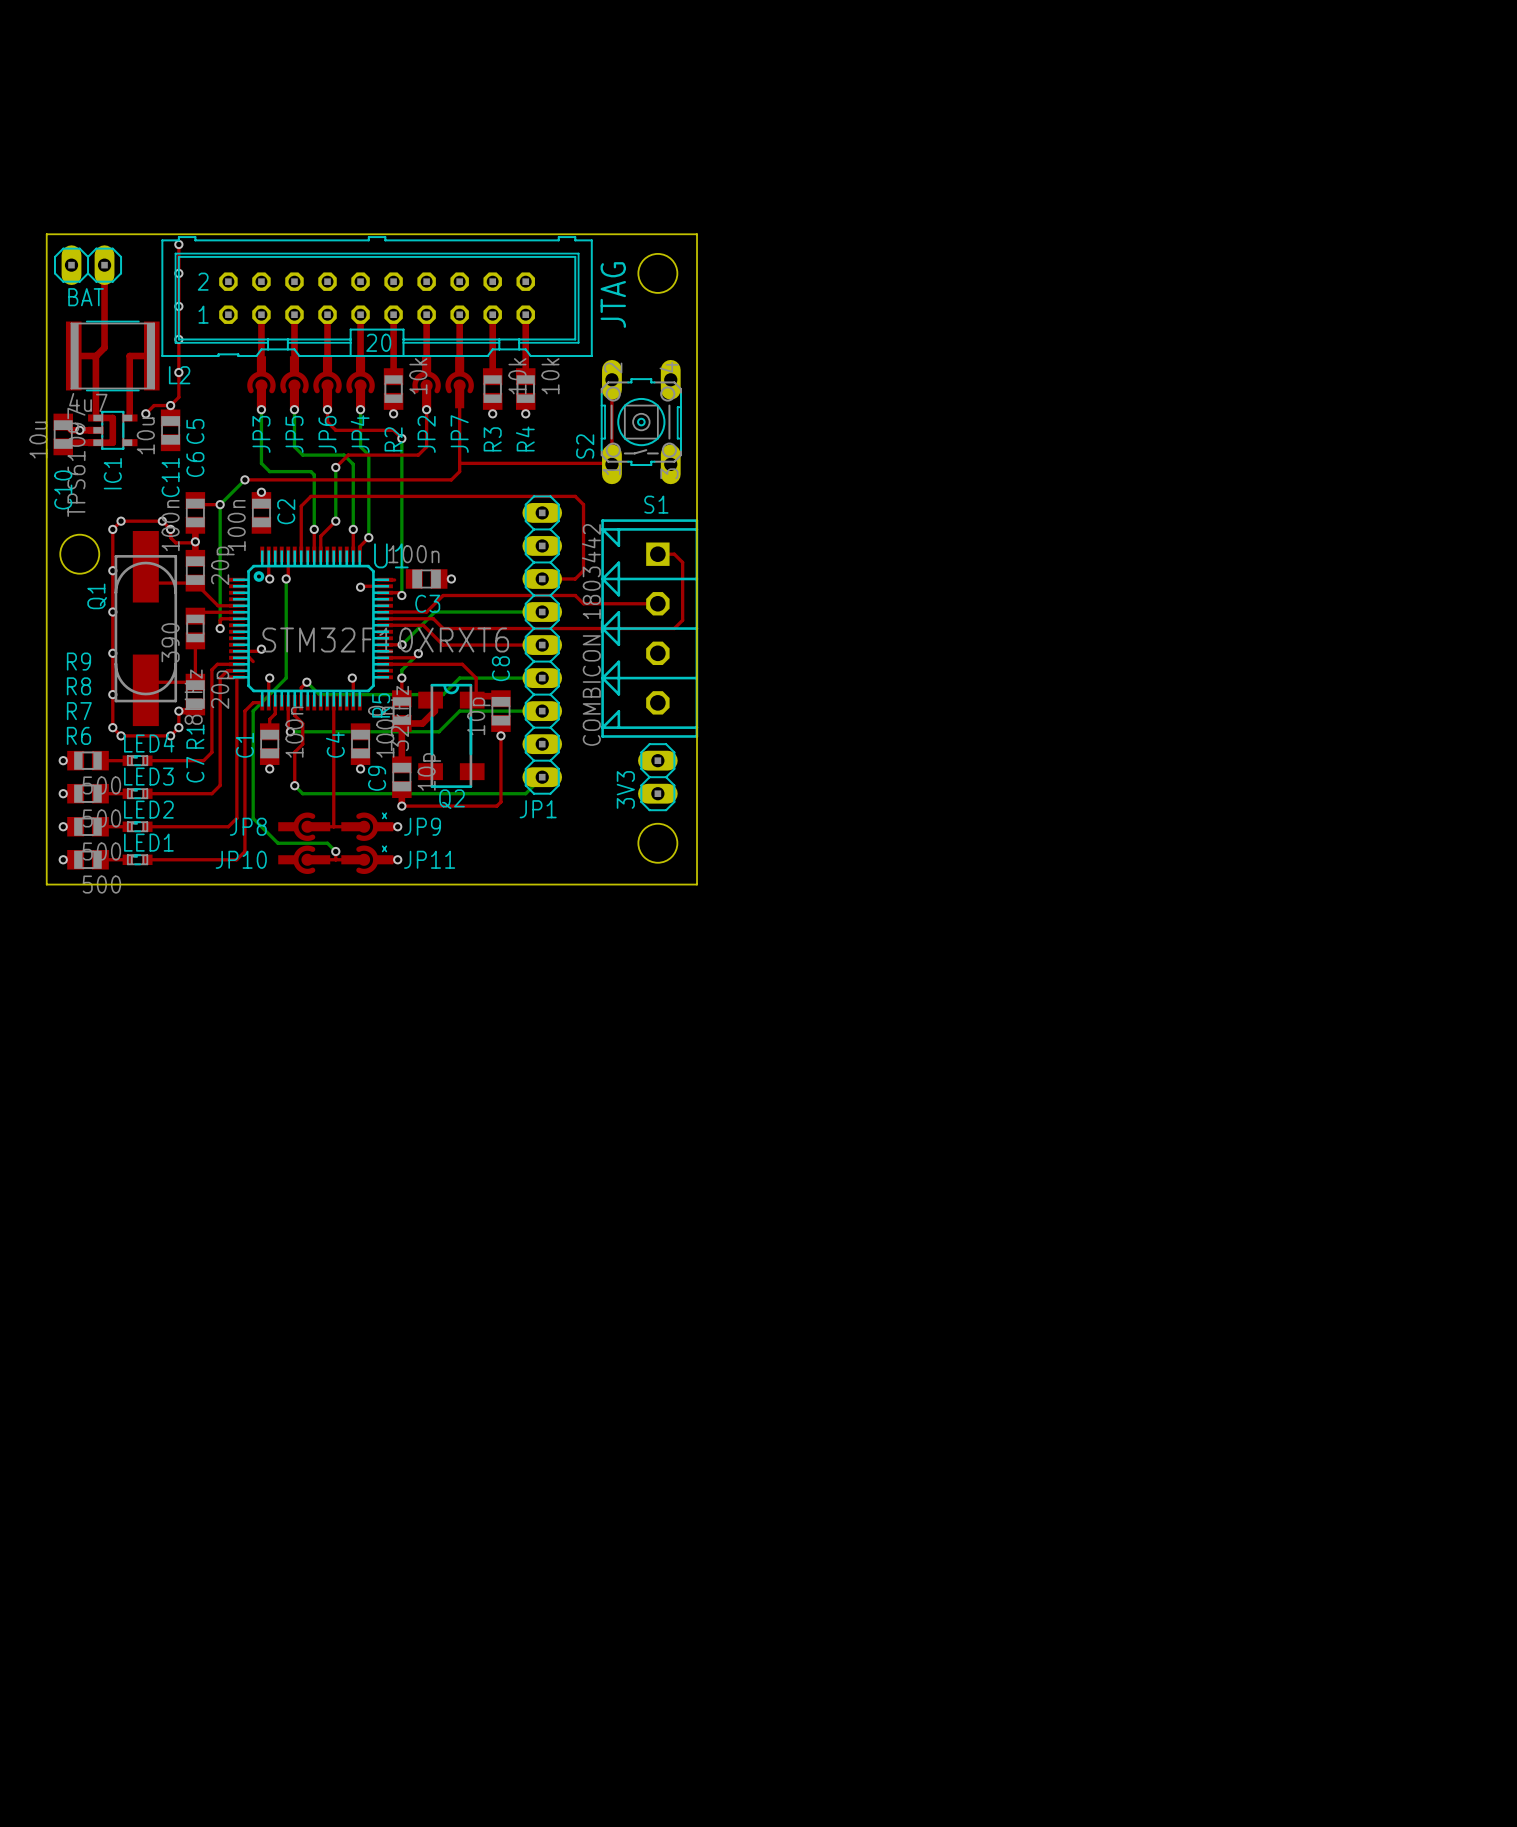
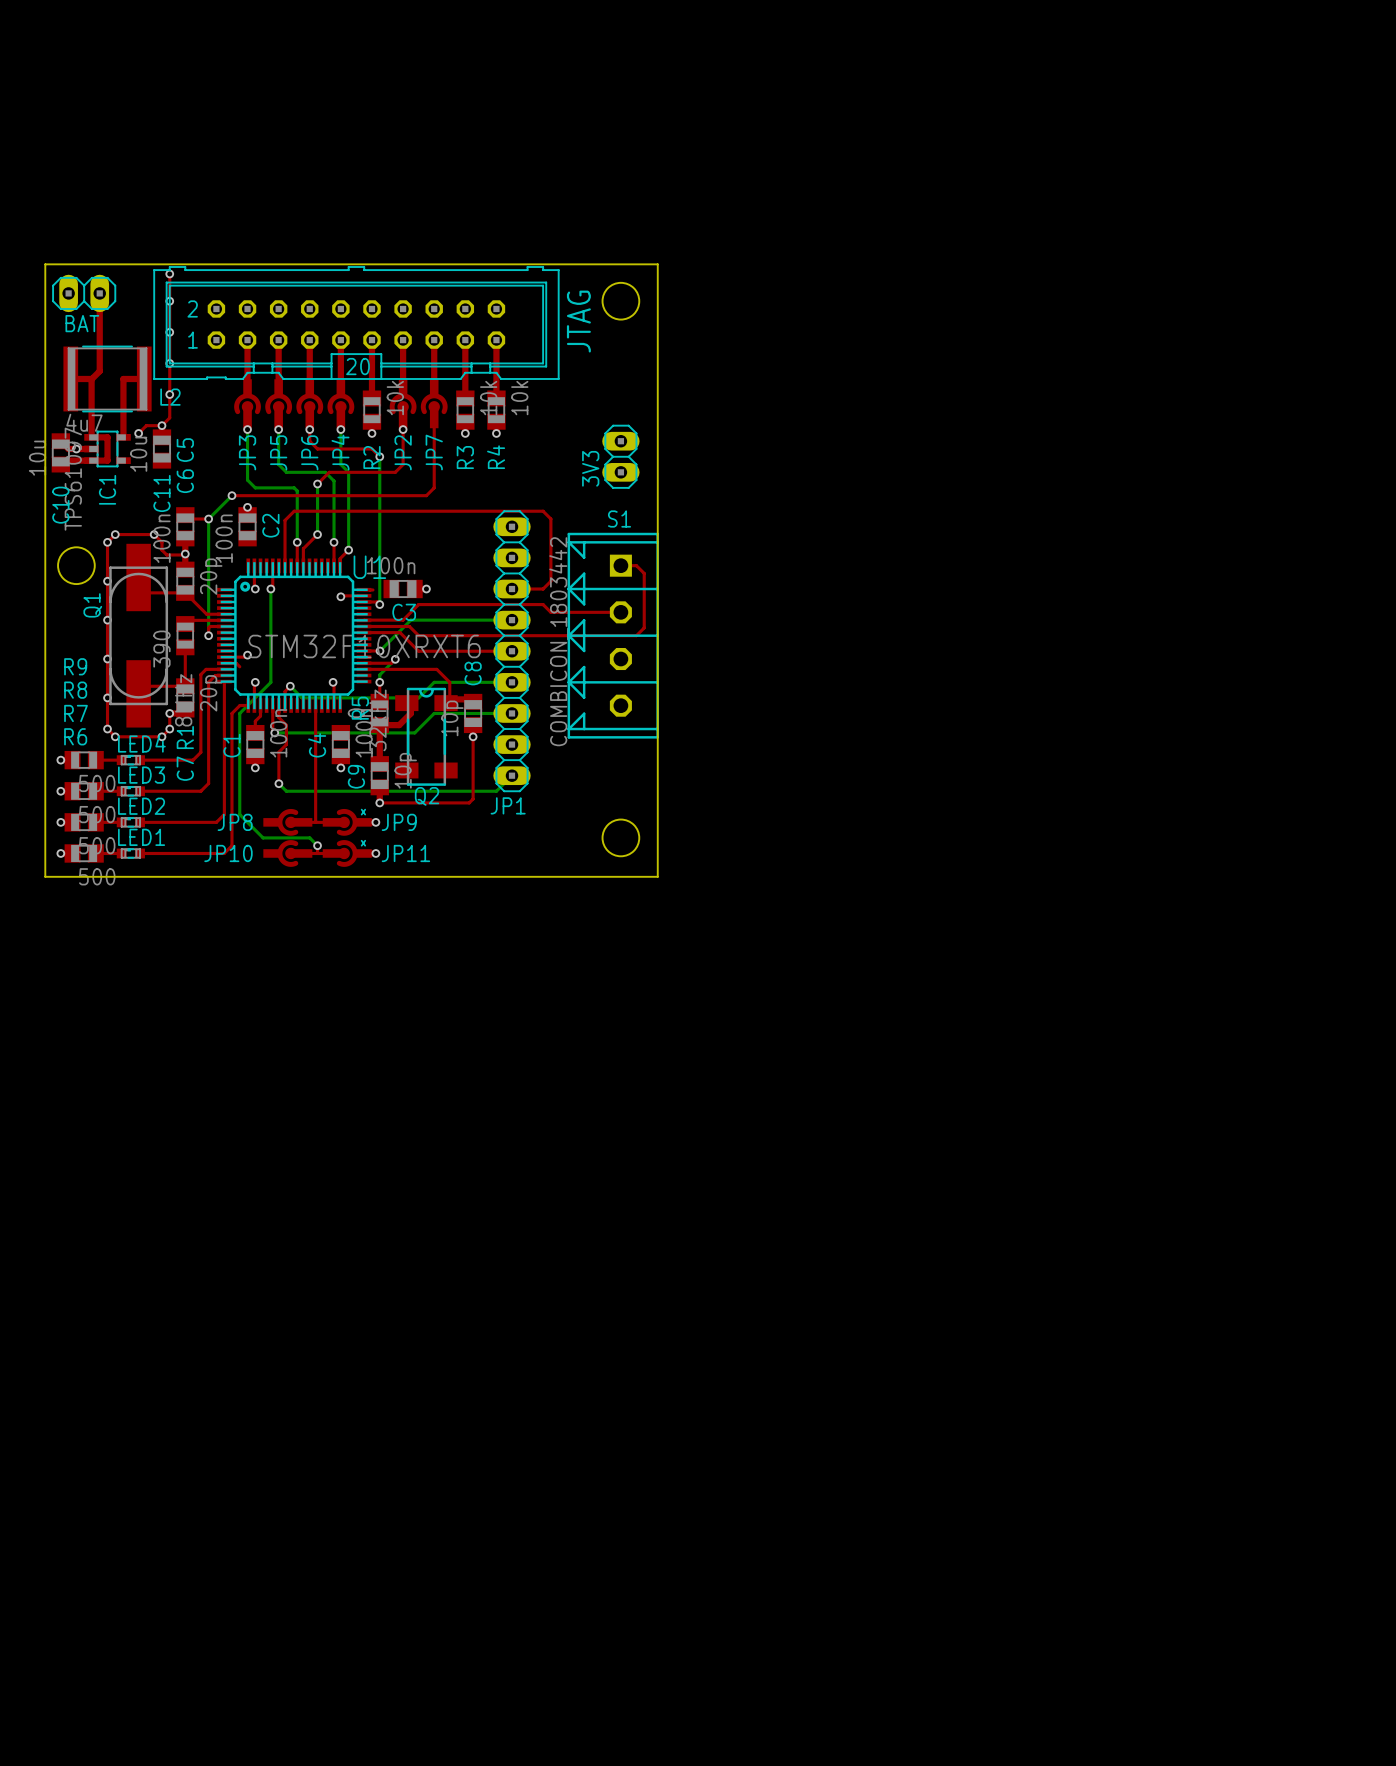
top track: (611, 379) (611, 464) (459, 463) -> none
S2: (641, 422) -> none
via: (170, 529) -> none
3V3 position: (657, 777) -> (620, 456)

